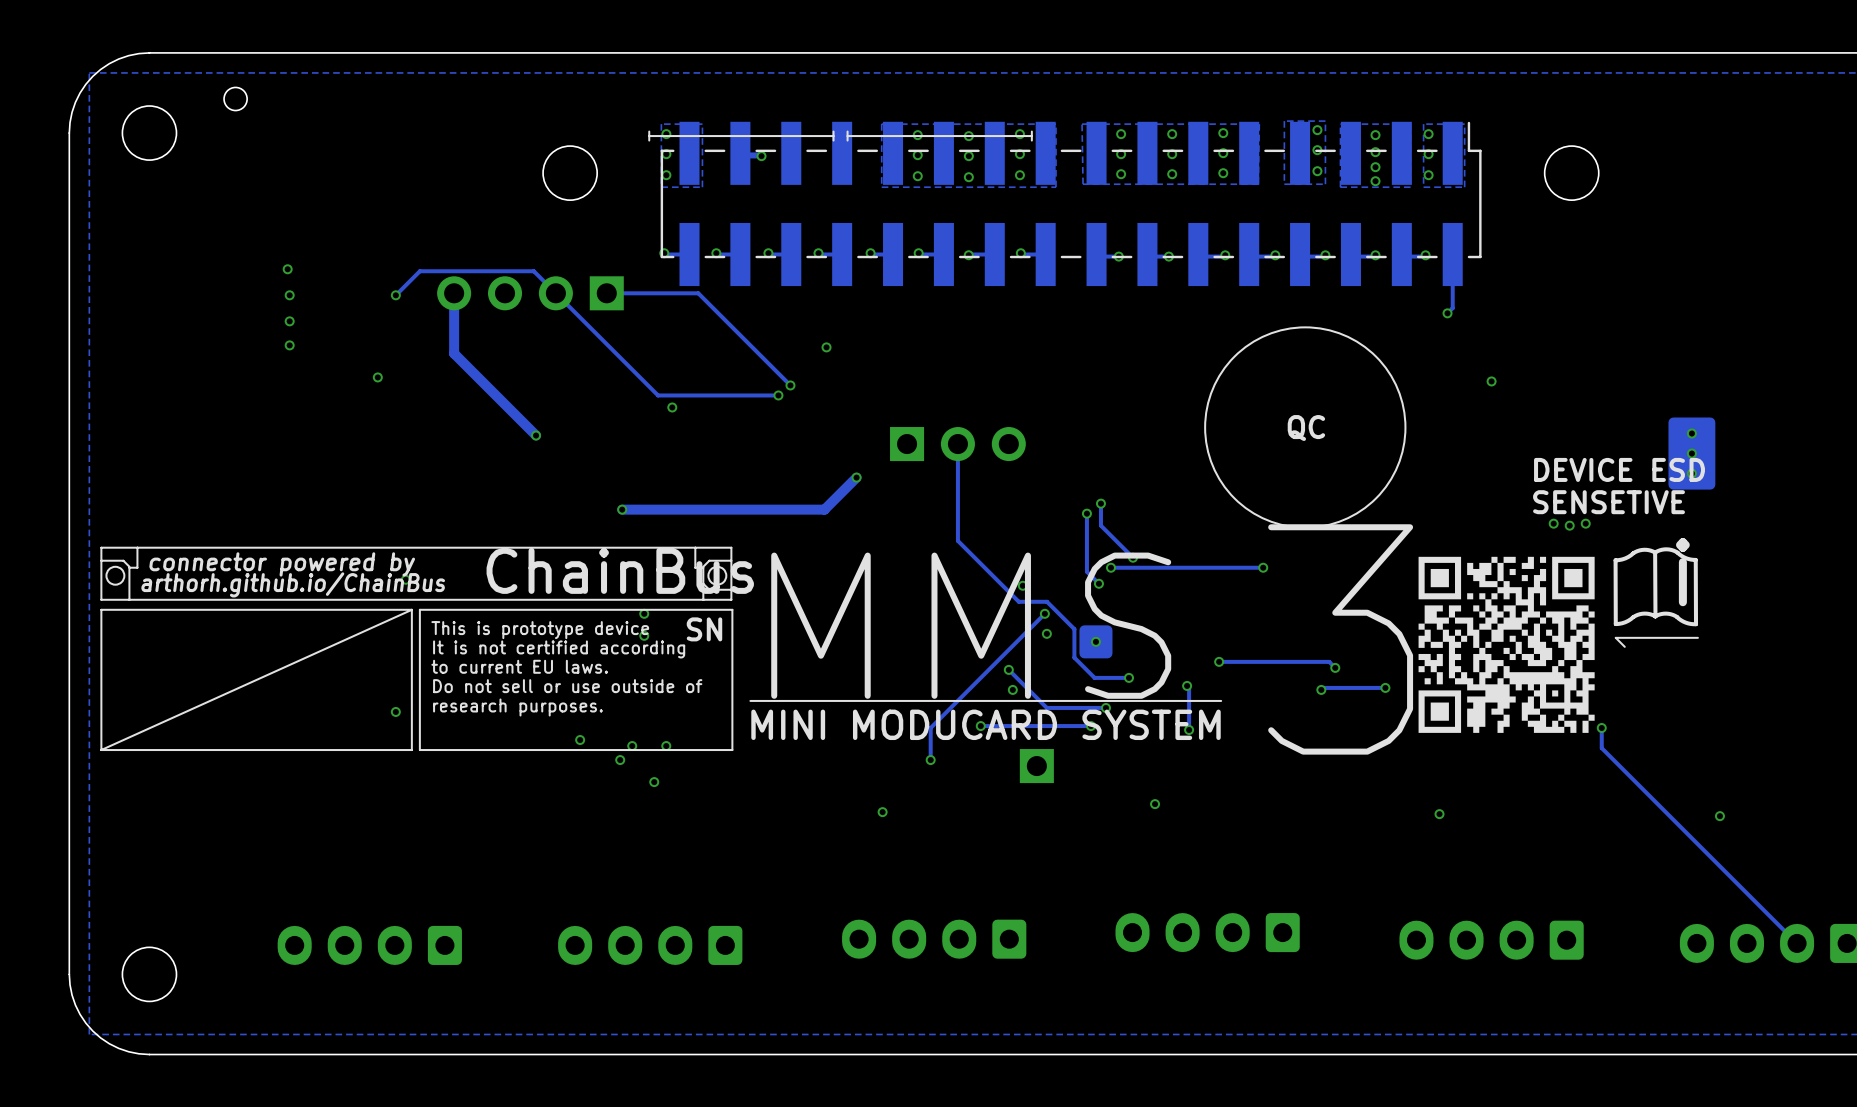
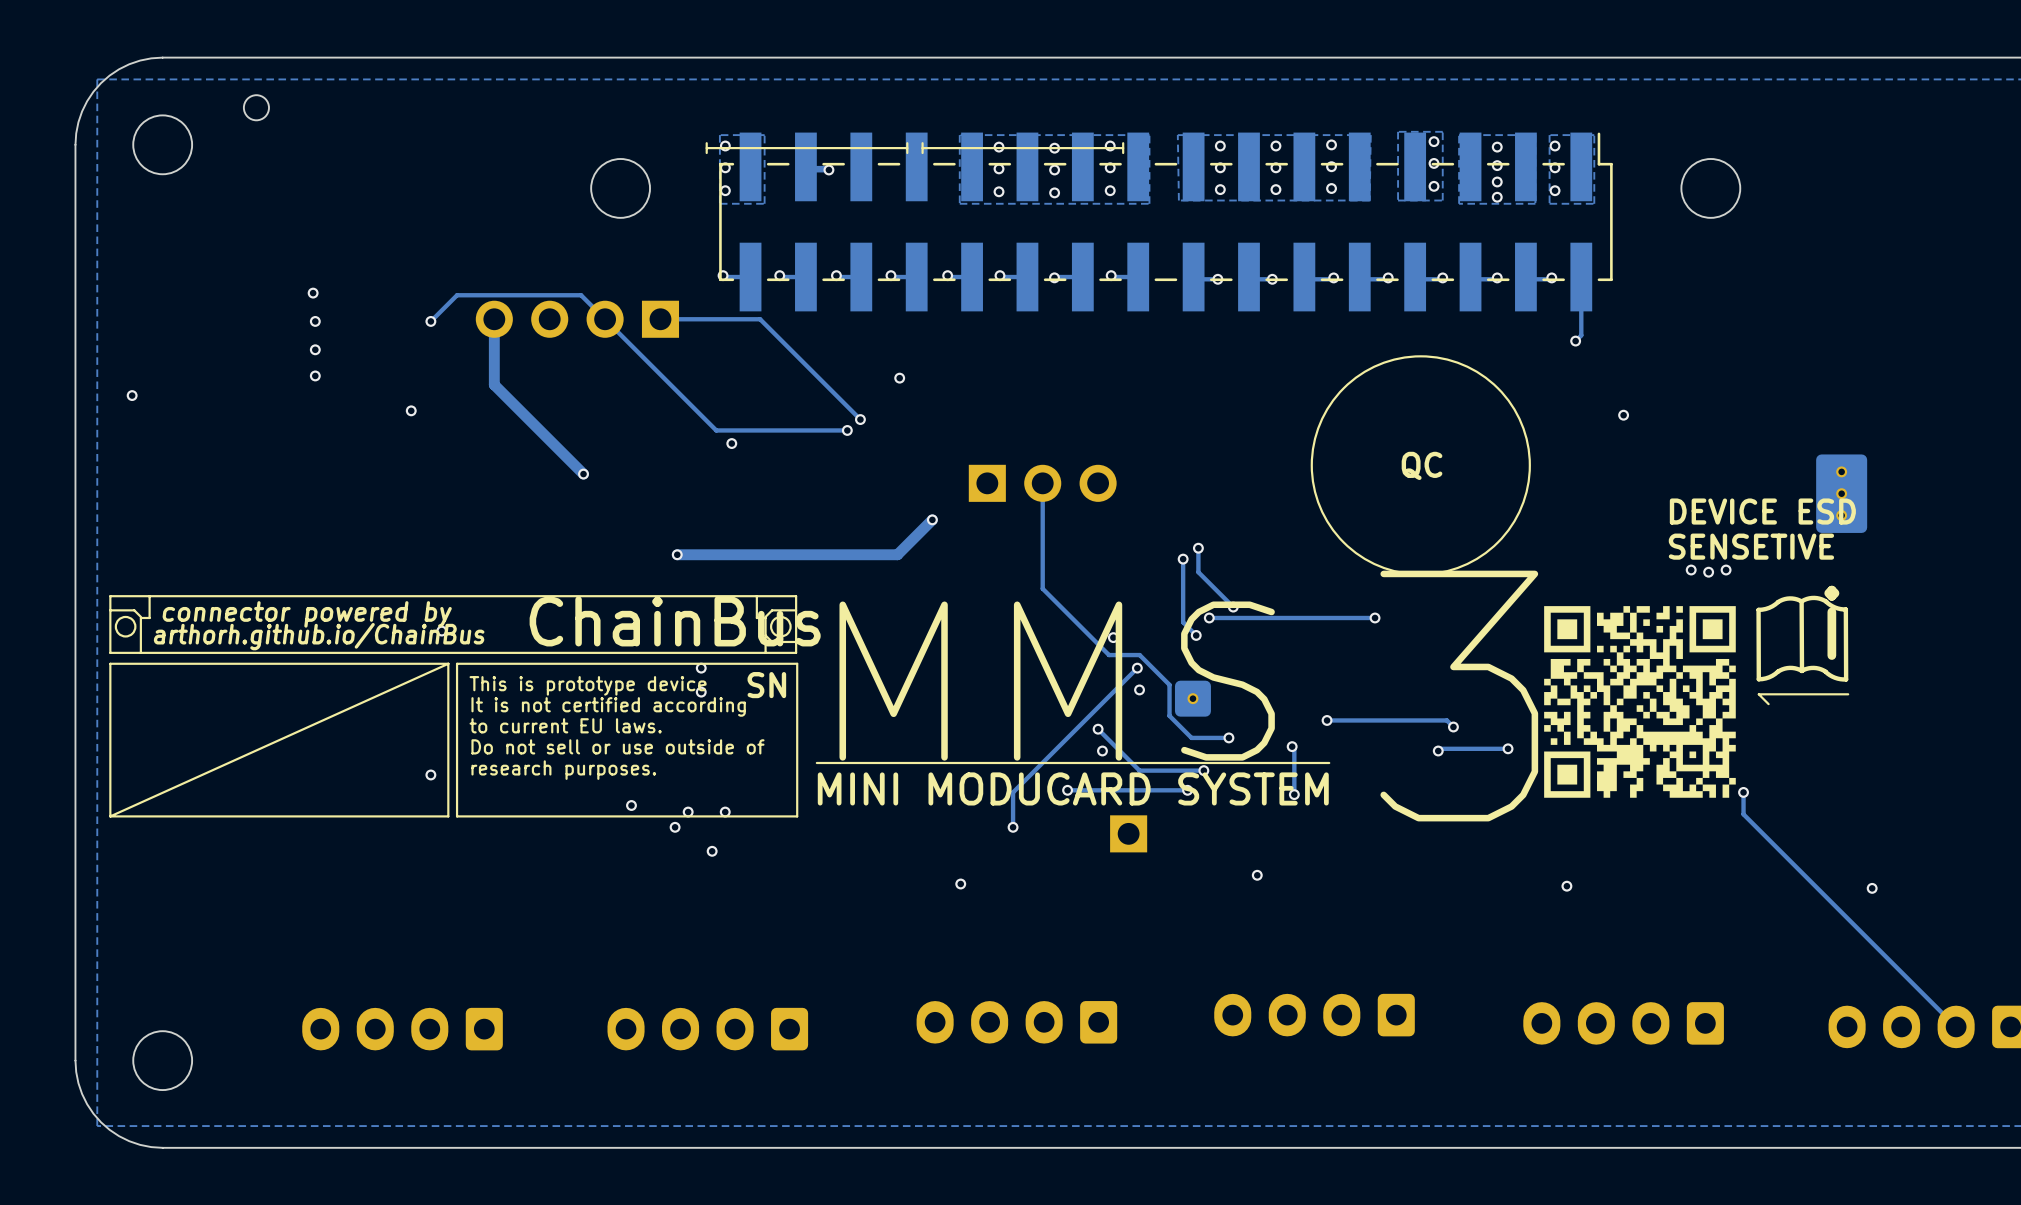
via: none -> (132, 395)

